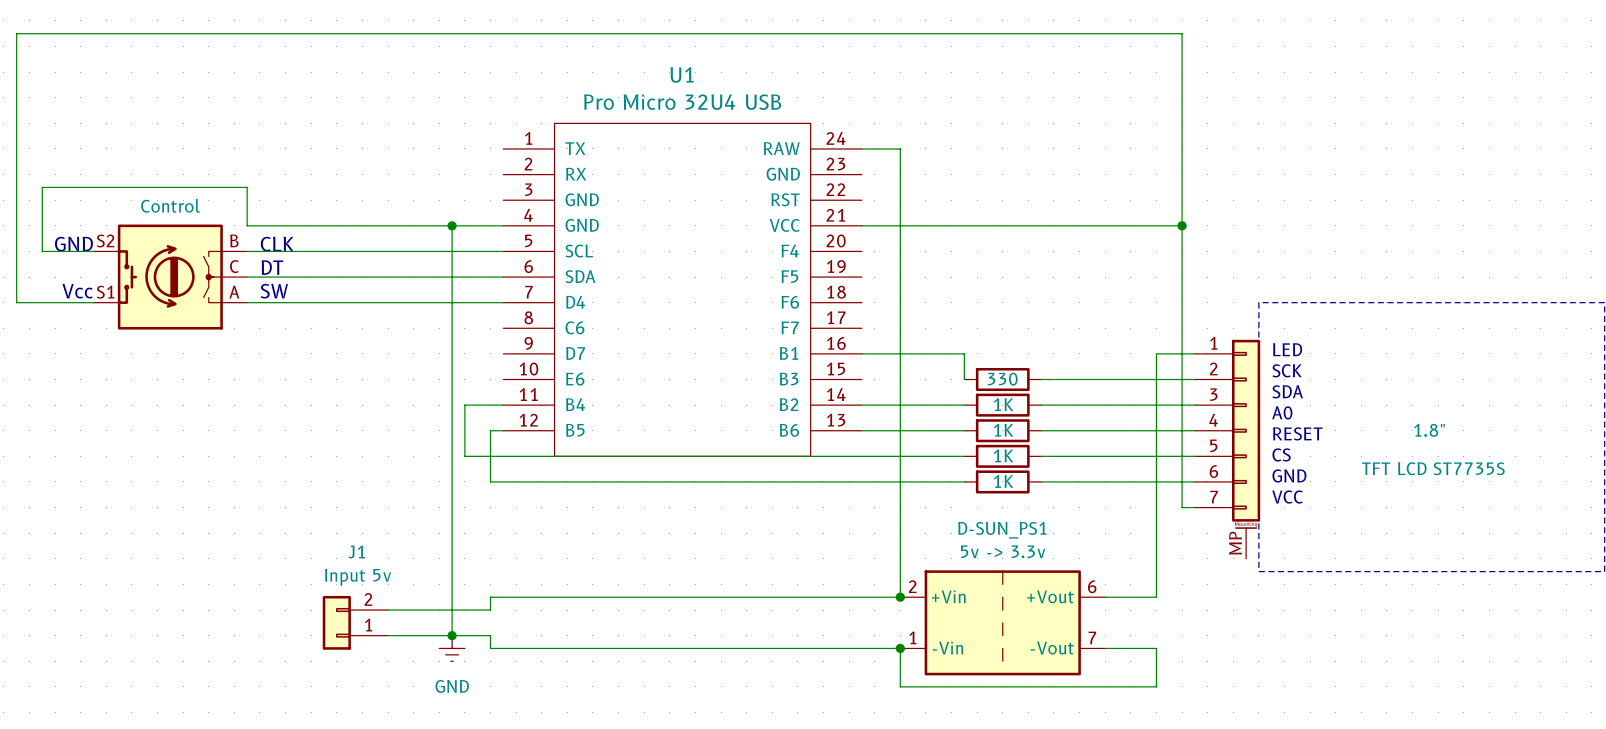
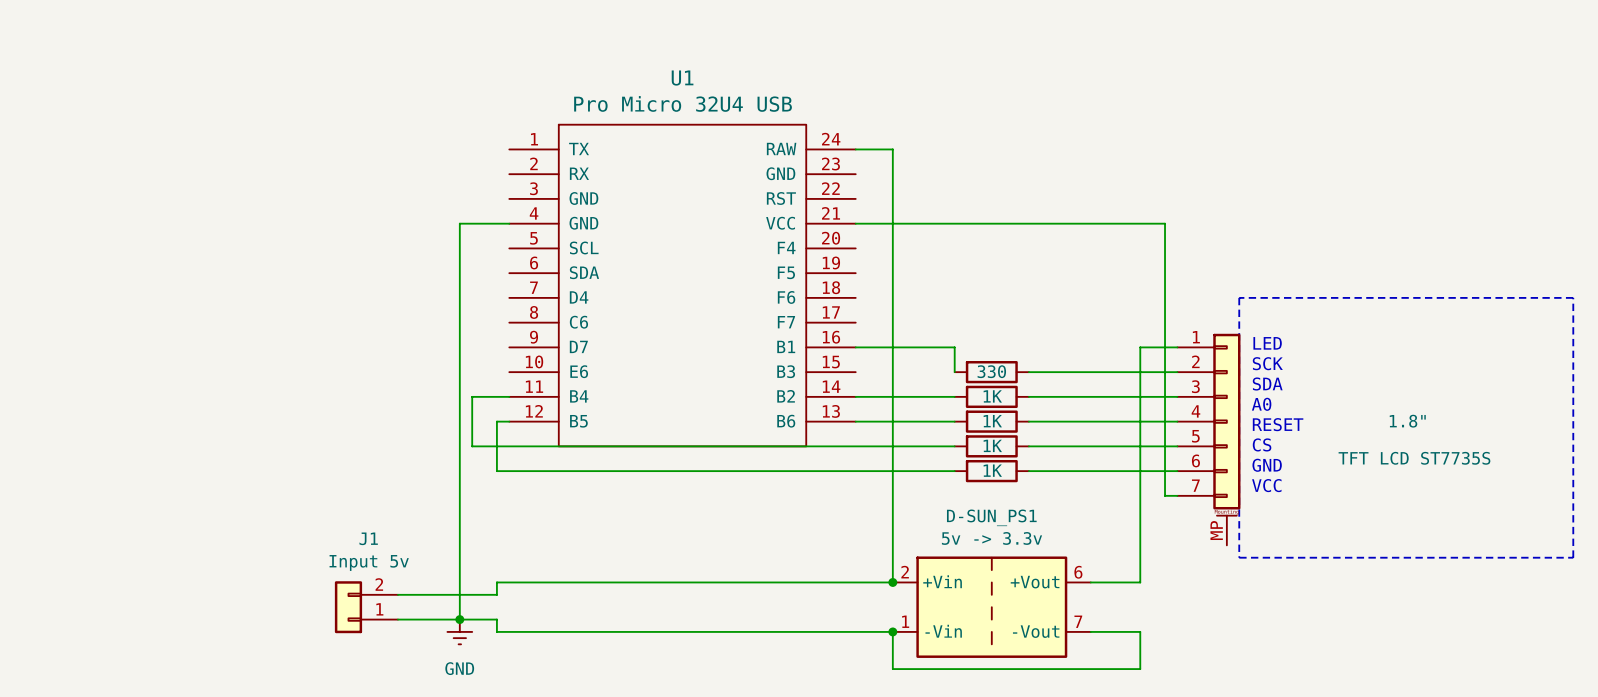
wire: (452, 225) (247, 225) (247, 187) (42, 187) (42, 251) (93, 251) -> none
junction: (452, 225) -> none
wire: (1182, 225) (1182, 33) (16, 33) (16, 302) (93, 302) -> none
junction: (1182, 225) -> none
text: GND (73, 244) -> none
text: CLK (277, 244) -> none
wire: (247, 251) (503, 251) -> none
text: DT (272, 267) -> none
Control: (170, 277) -> none
wire: (247, 277) (503, 277) -> none
text: Vcc (77, 291) -> none
text: SW (274, 291) -> none
wire: (247, 302) (503, 302) -> none

